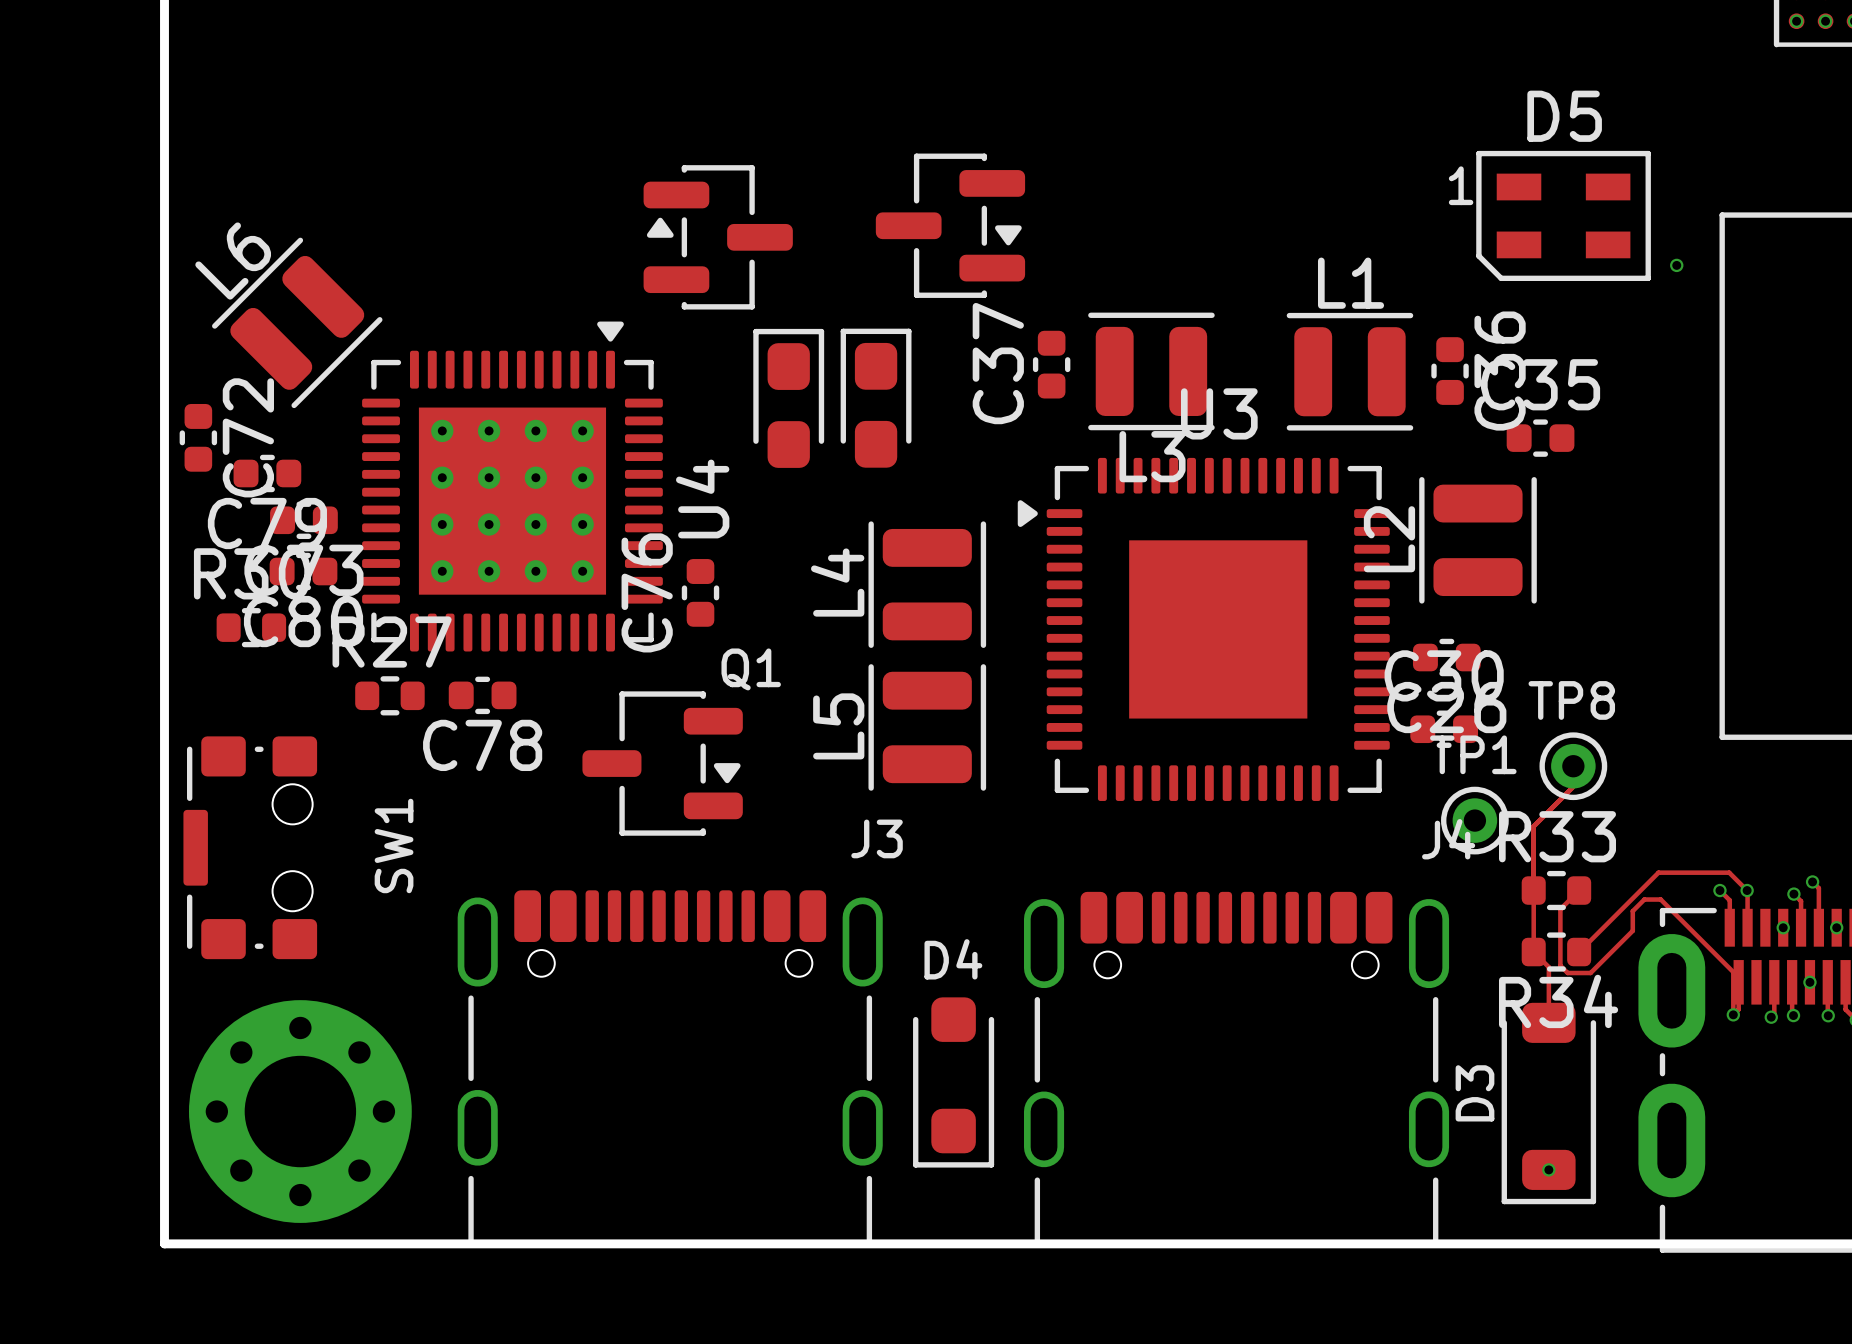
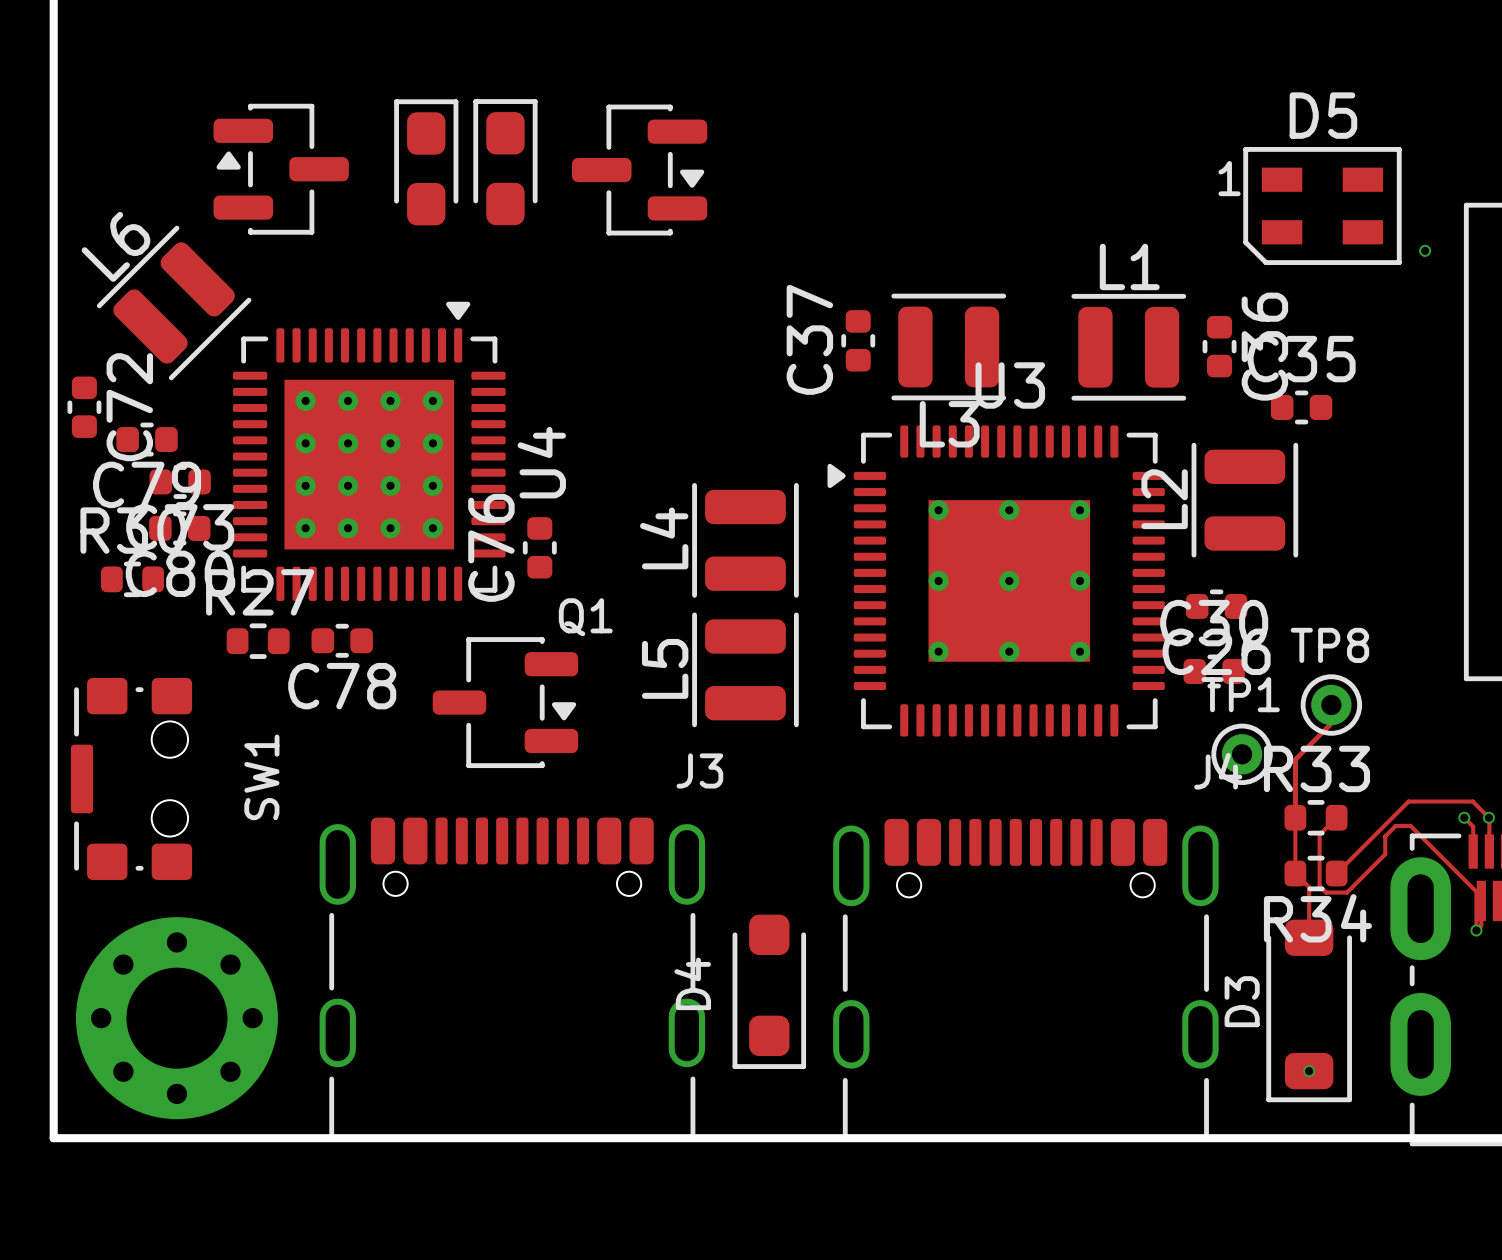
part: none -> (426, 162)
part: none -> (505, 162)
part: none -> (281, 169)
part: none -> (639, 170)
part: (950, 225) -> none
part: (718, 237) -> none
part: (788, 398) -> none
part: (876, 398) -> none
U3 footprint: [1017, 457, 1390, 801] -> [827, 425, 1165, 737]
D4 name rotation: 0° (953, 959) -> 90° counterclockwise (692, 983)
D4 name position: D4 (953, 959) -> D4 (692, 983)

